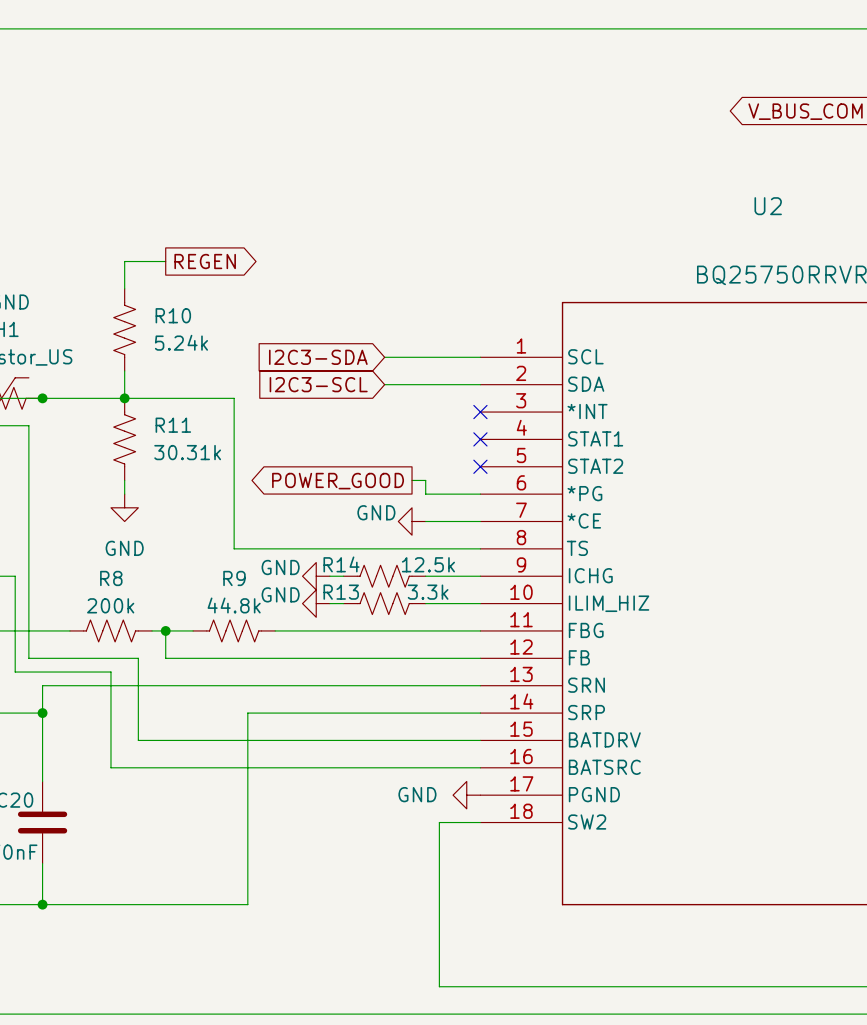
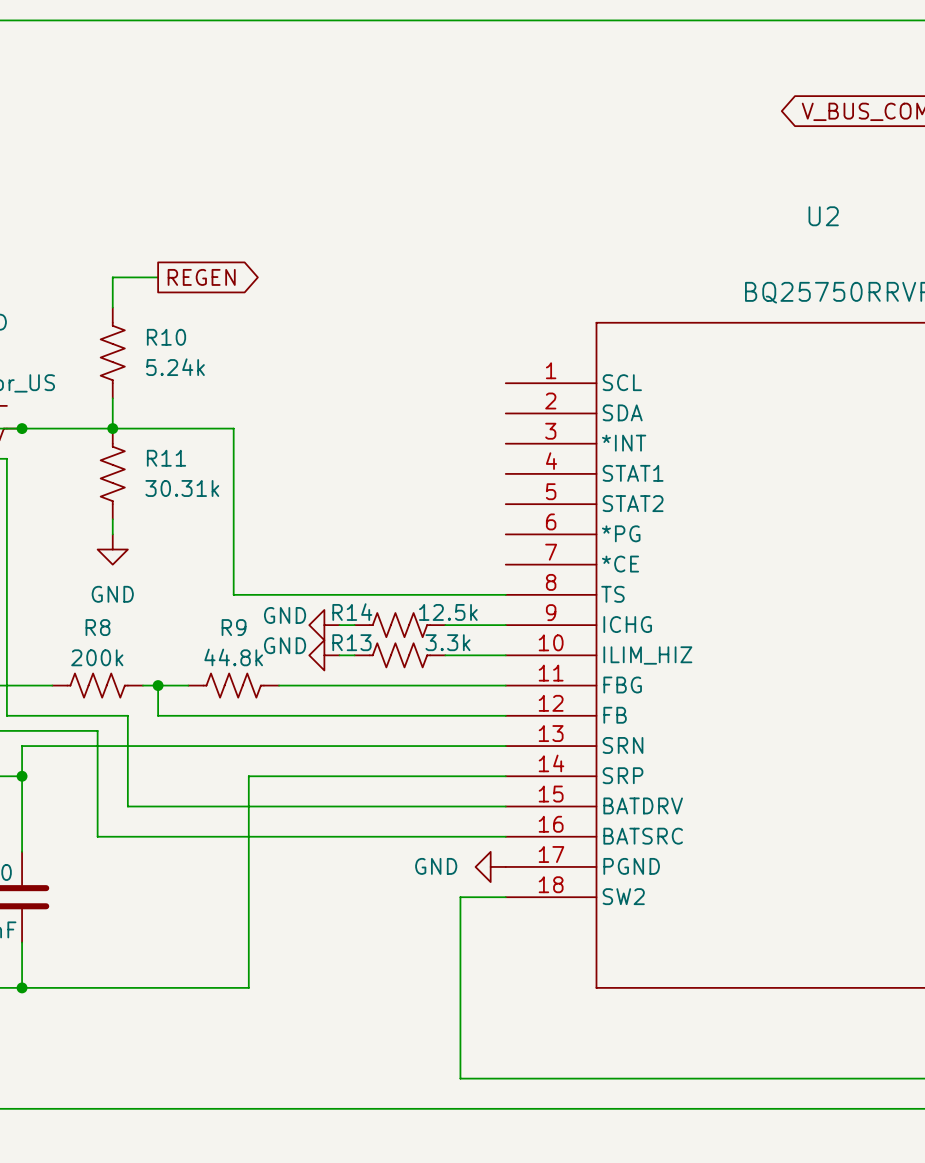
global label: I2C3-SDA (318, 357) -> none
wire: (384, 357) (480, 357) -> none
global label: I2C3-SCL (318, 384) -> none
wire: (384, 384) (480, 384) -> none
no-connect mark: (480, 412) -> none
no-connect mark: (480, 439) -> none
no-connect mark: (480, 466) -> none
wire: (412, 480) (425, 480) (425, 494) (480, 494) -> none
global label: POWER_GOOD (338, 481) -> none
power symbol: GND (412, 521) -> none
wire: (425, 521) (480, 521) -> none

